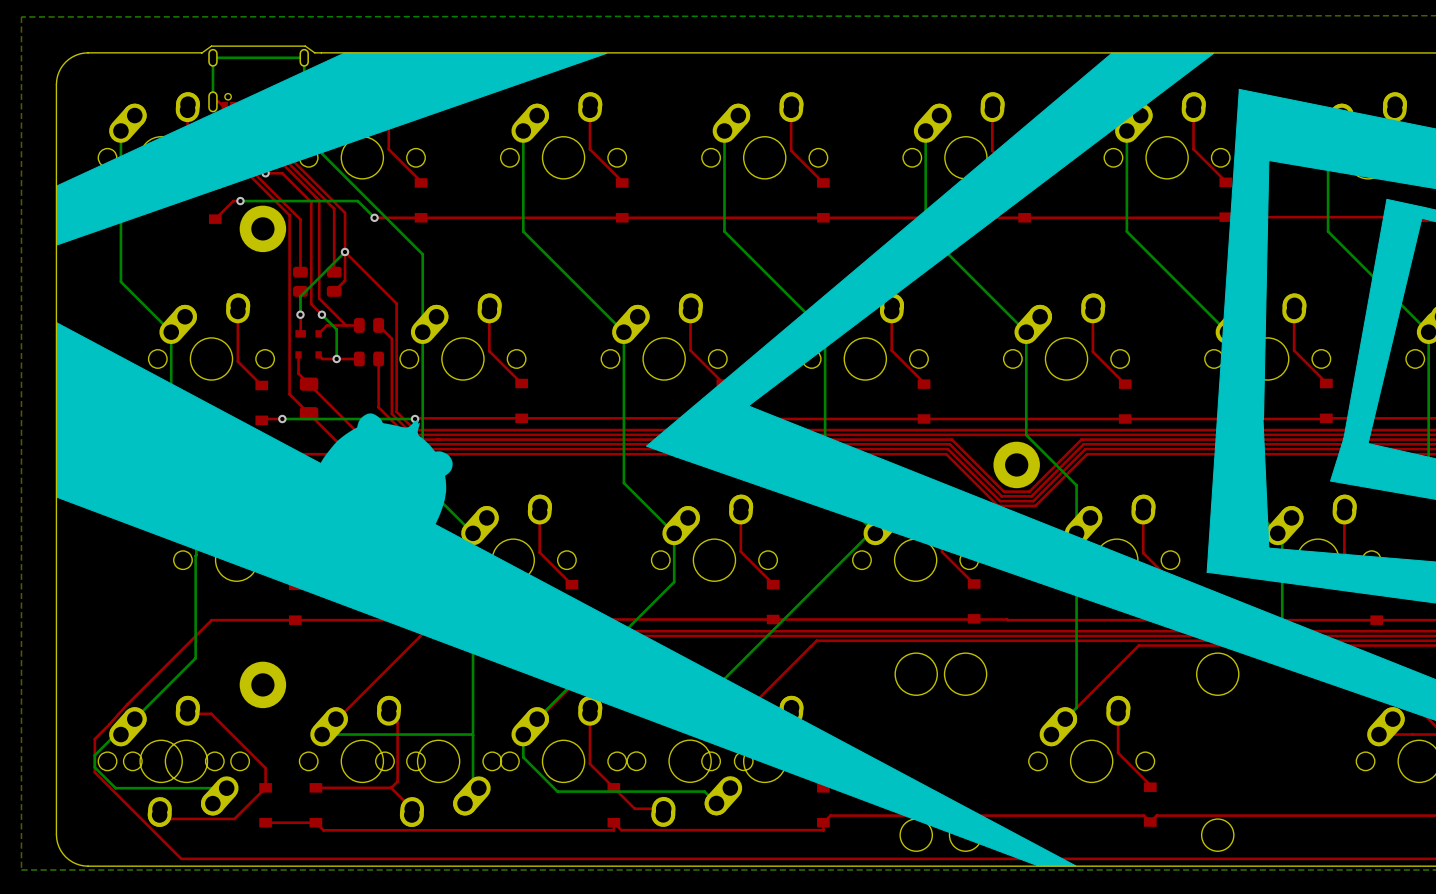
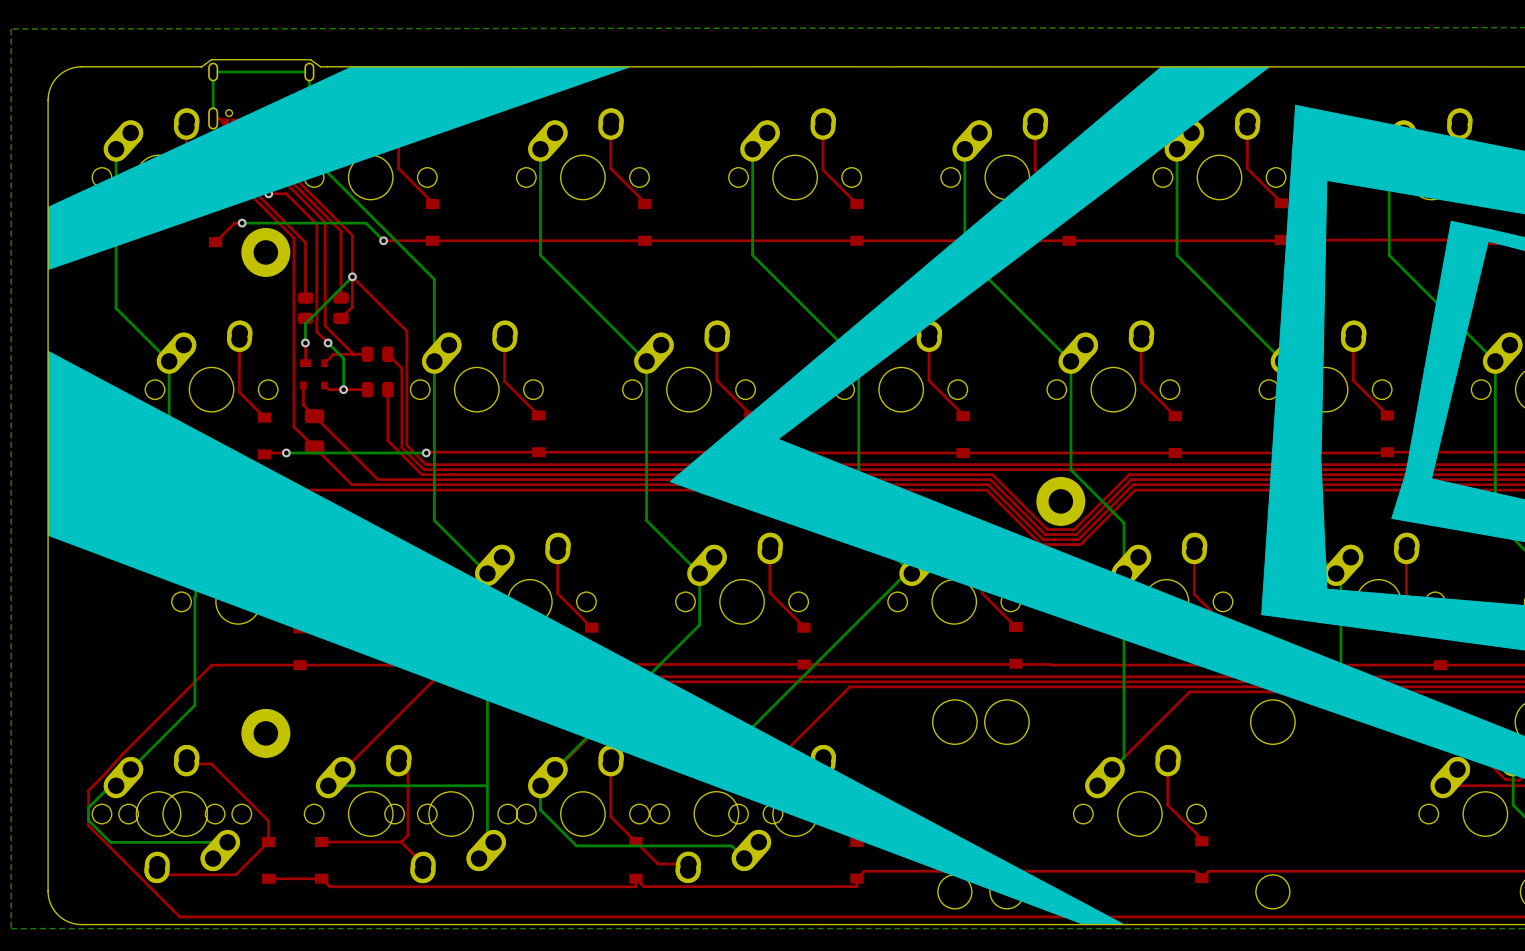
drawing: [320, 413, 453, 530] -> none

